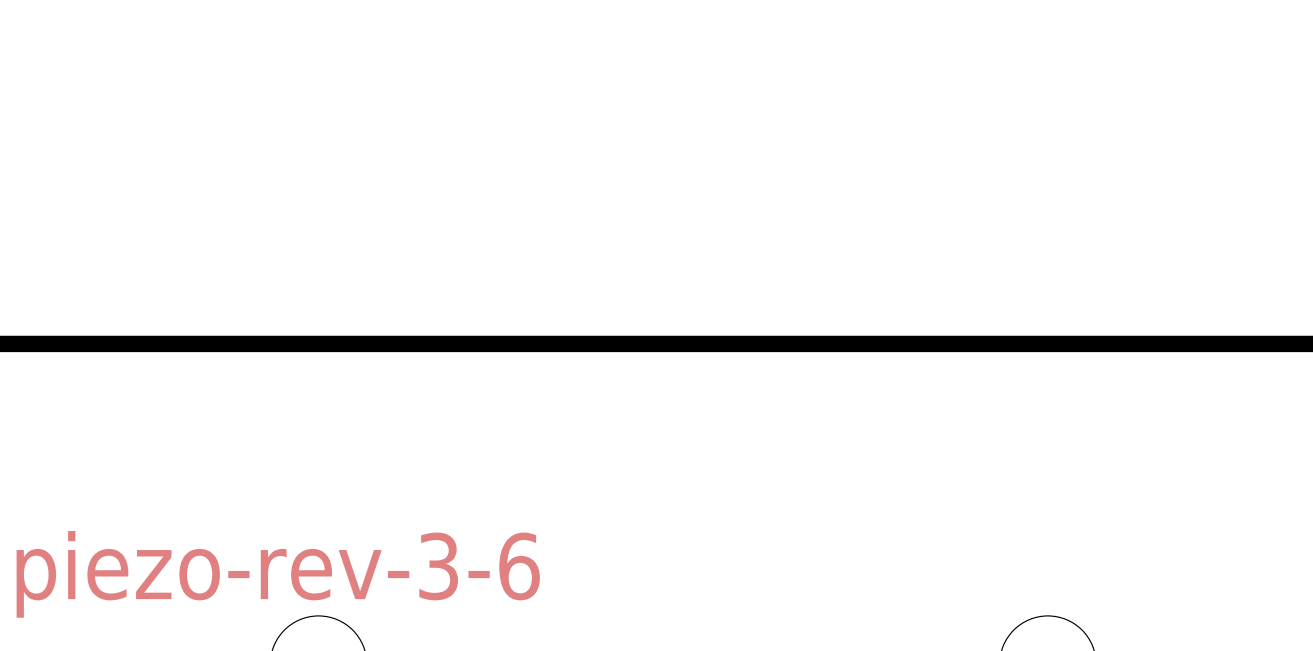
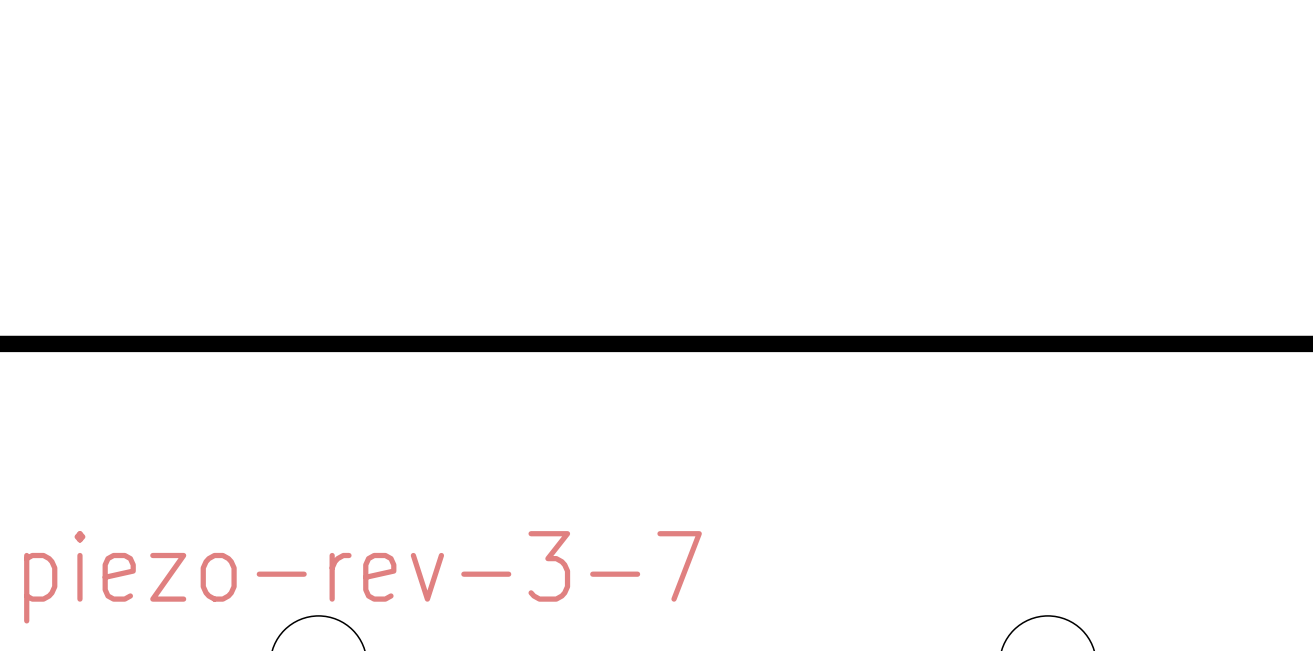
text: piezo-rev-3-6 (278, 574) -> piezo-rev-3-7 (362, 577)

